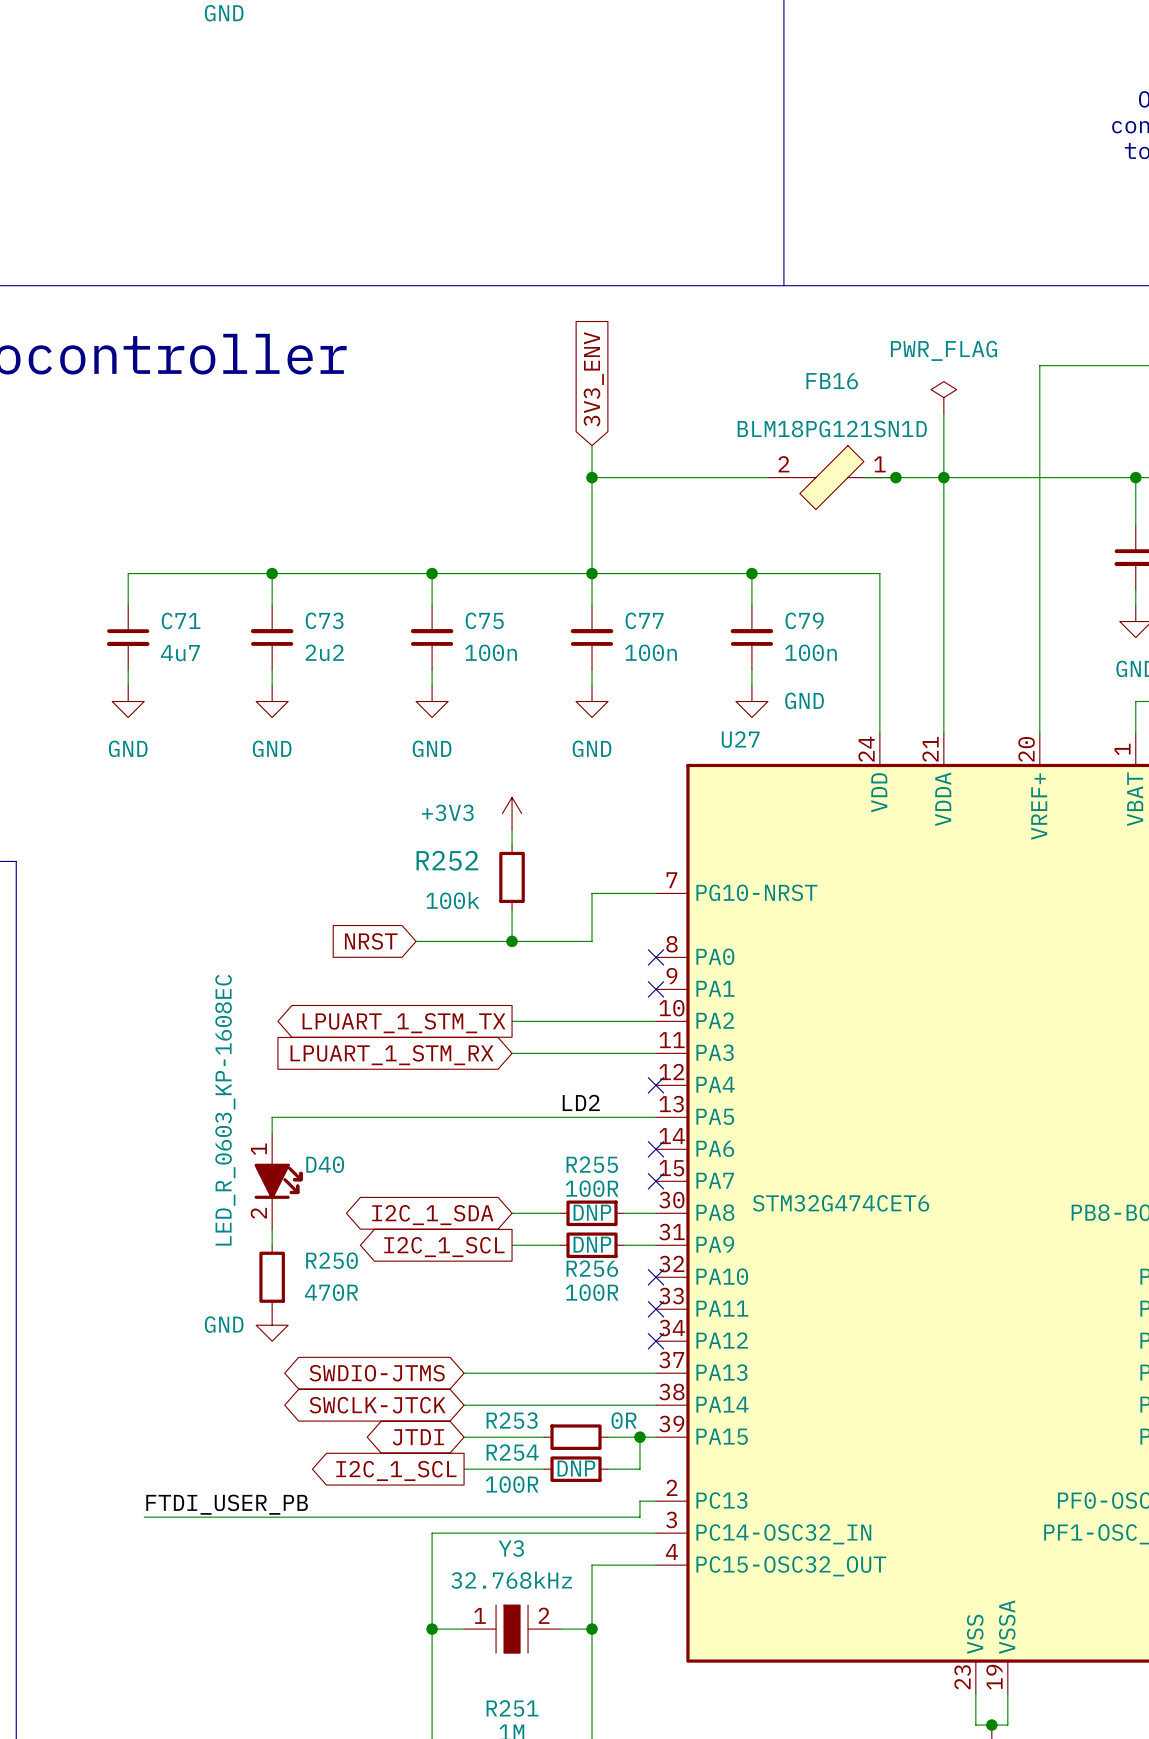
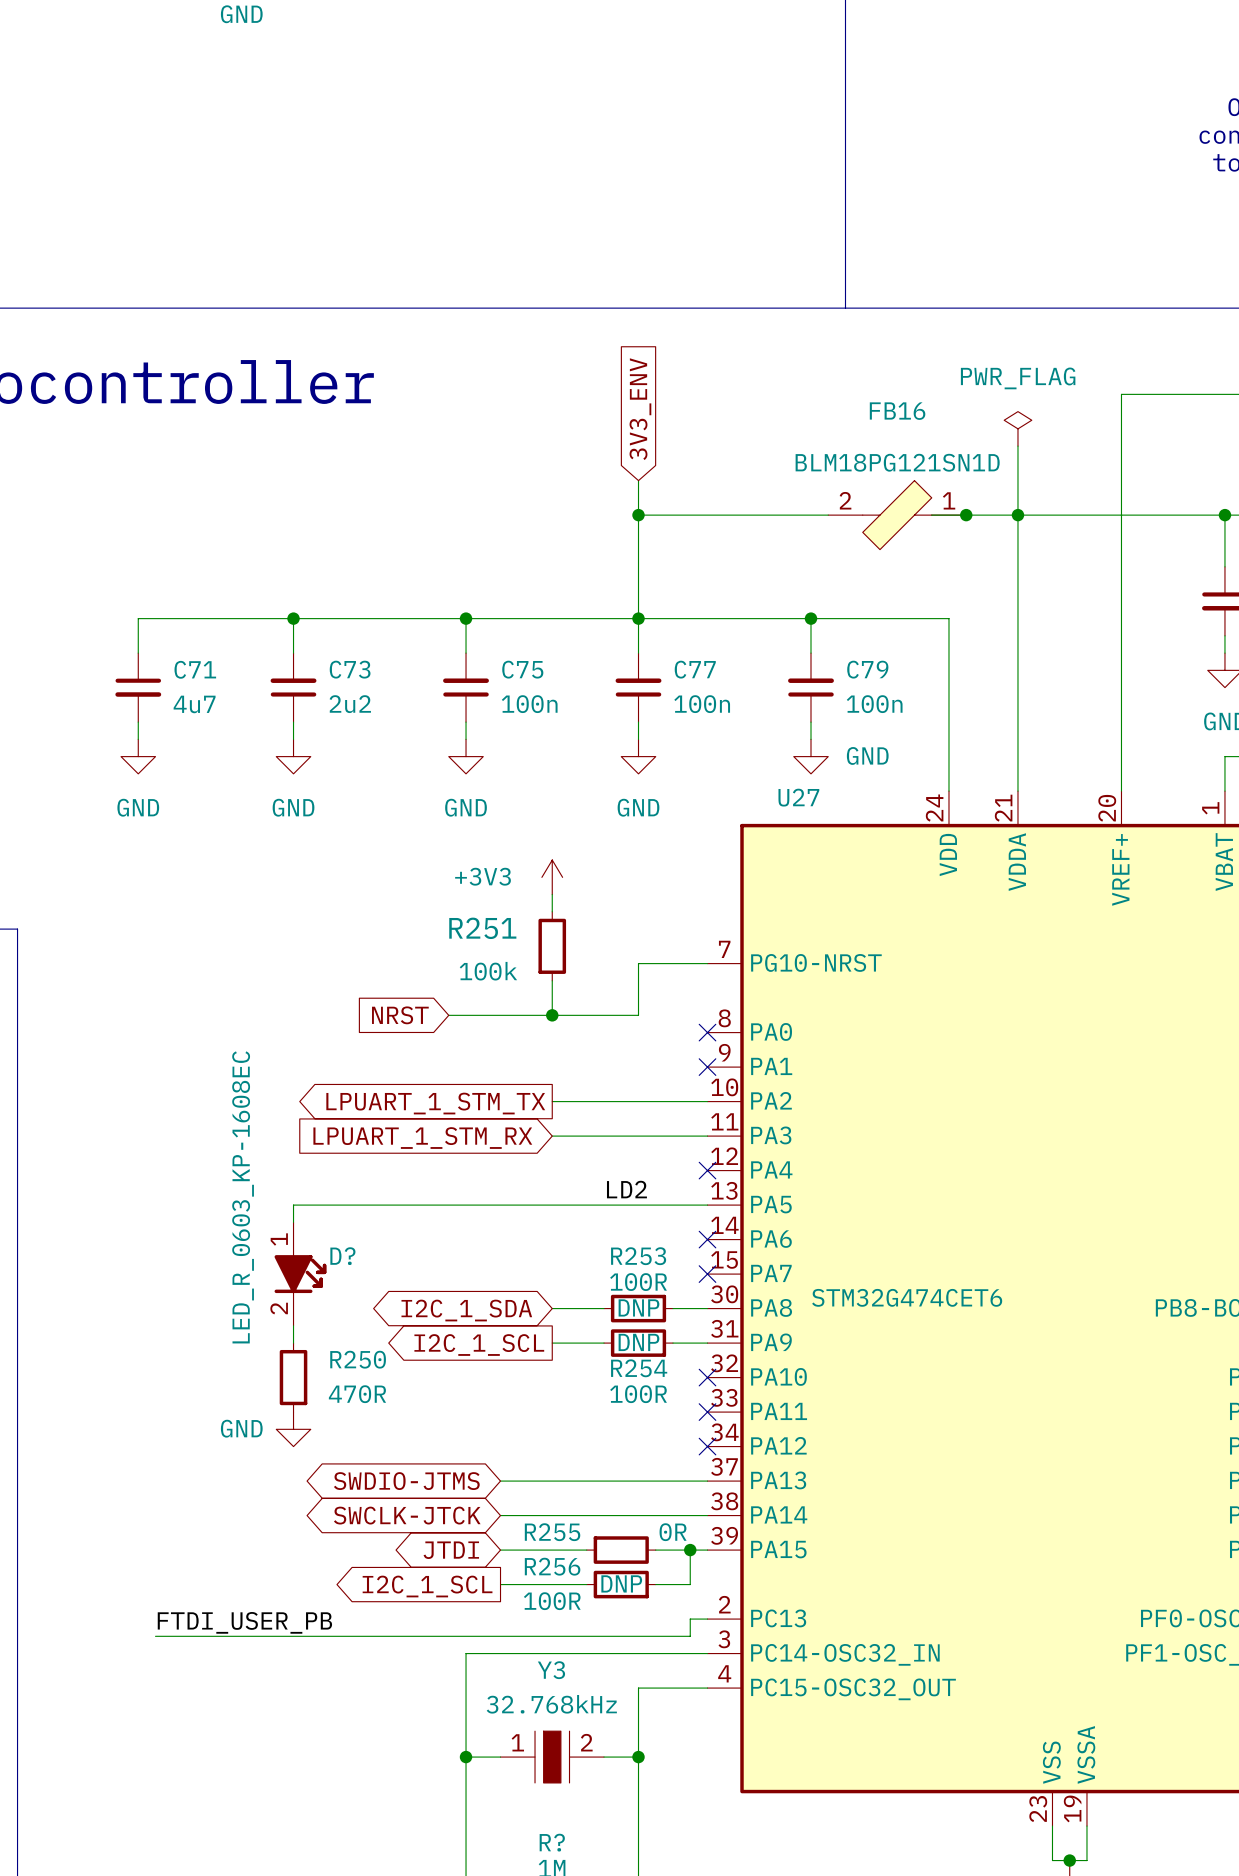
R252 name: R252 (447, 860) -> R251 (482, 928)
D40 name: D40 (325, 1164) -> D? (342, 1256)
R255 name: R255 (592, 1164) -> R253 (638, 1256)
R256 name: R256 (592, 1268) -> R254 (639, 1368)
R253 name: R253 (512, 1420) -> R255 (552, 1532)
R254 name: R254 (512, 1452) -> R256 (552, 1566)
R251 name: R251 (512, 1708) -> R? (552, 1842)

